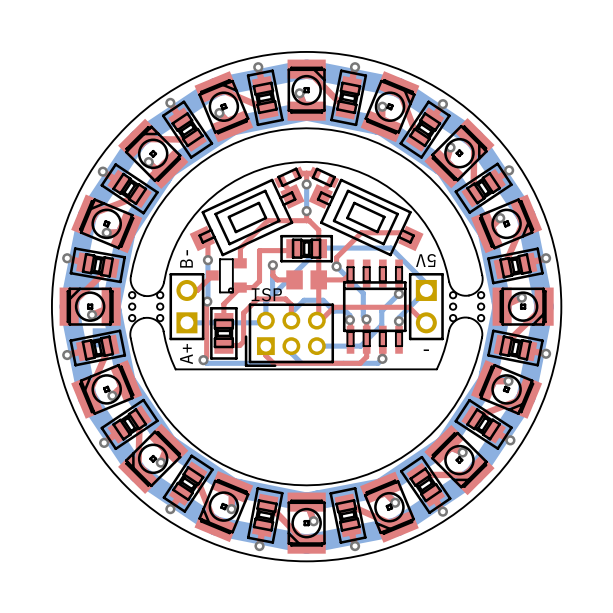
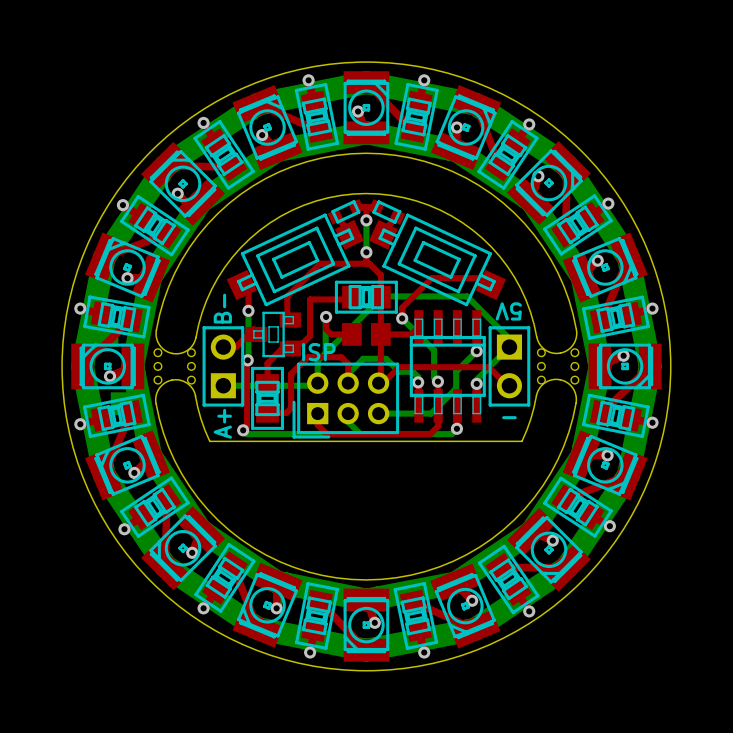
part footprint: [206, 258, 247, 293] -> [246, 311, 301, 358]

